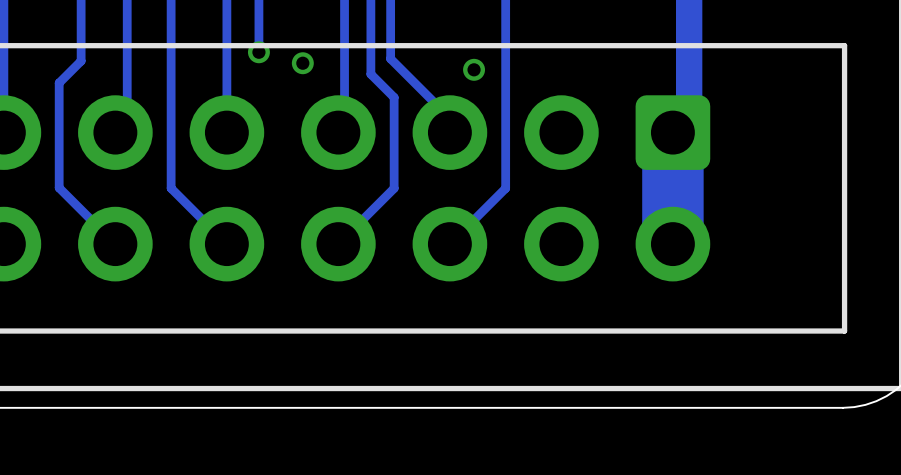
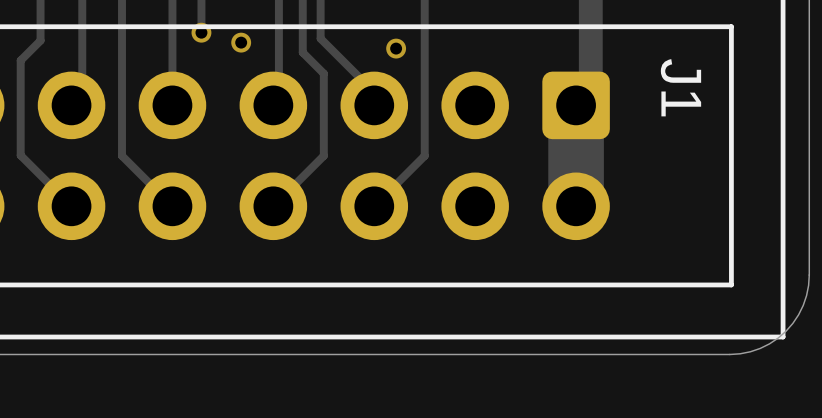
J1 name: none -> J1 (680, 87)

